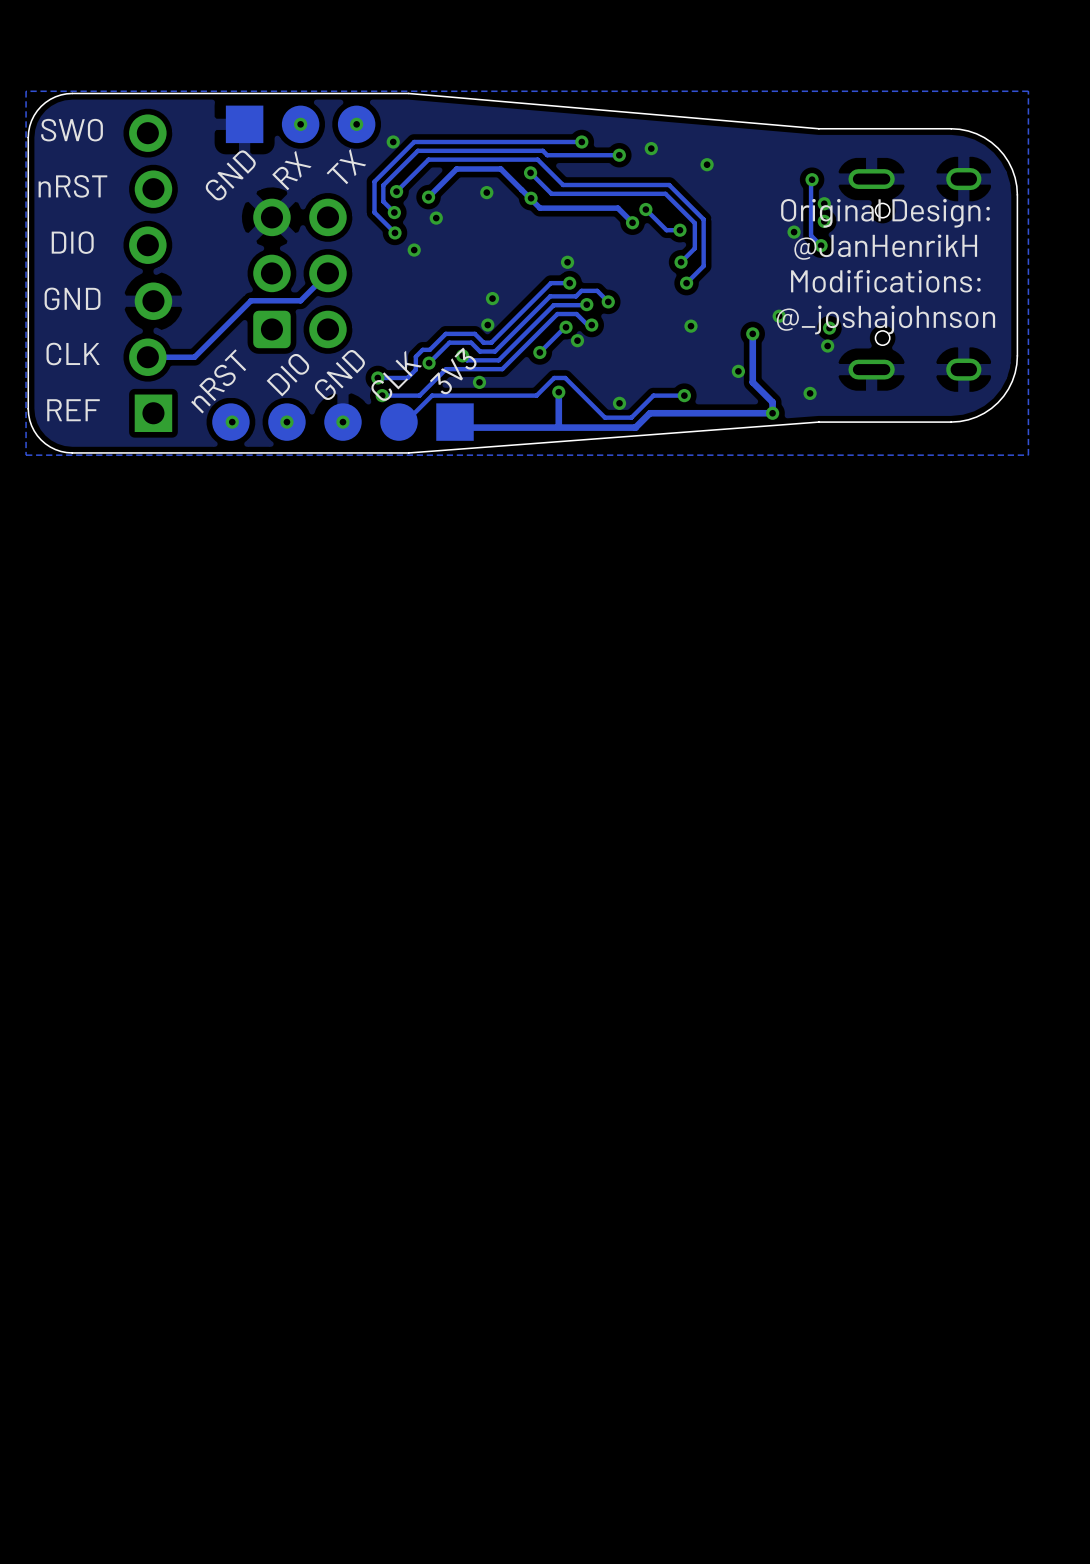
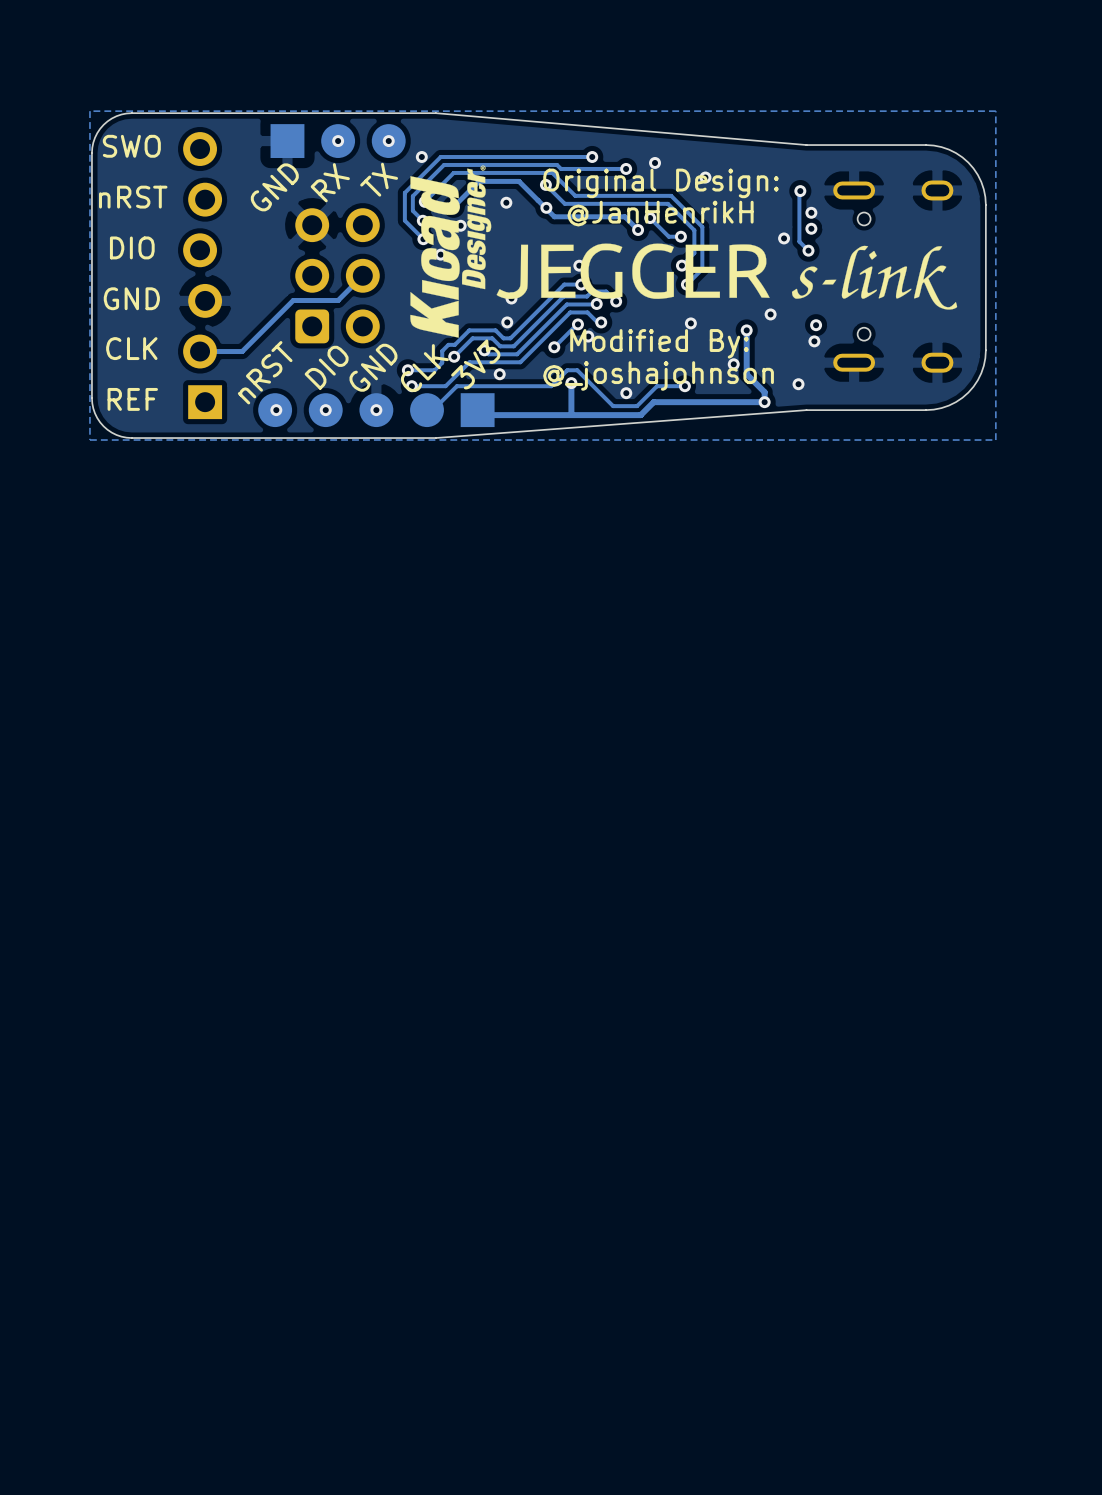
drawing: none -> [410, 165, 958, 338]
text position: Original Design: (885, 213) -> Original Design: (661, 183)
text position: @JanHenrikH (885, 247) -> @JanHenrikH (660, 213)
text: Modifications: (885, 281) -> none
text position: @_joshajohnson (885, 319) -> @_joshajohnson (658, 375)
text: none -> Modified By: (659, 343)

